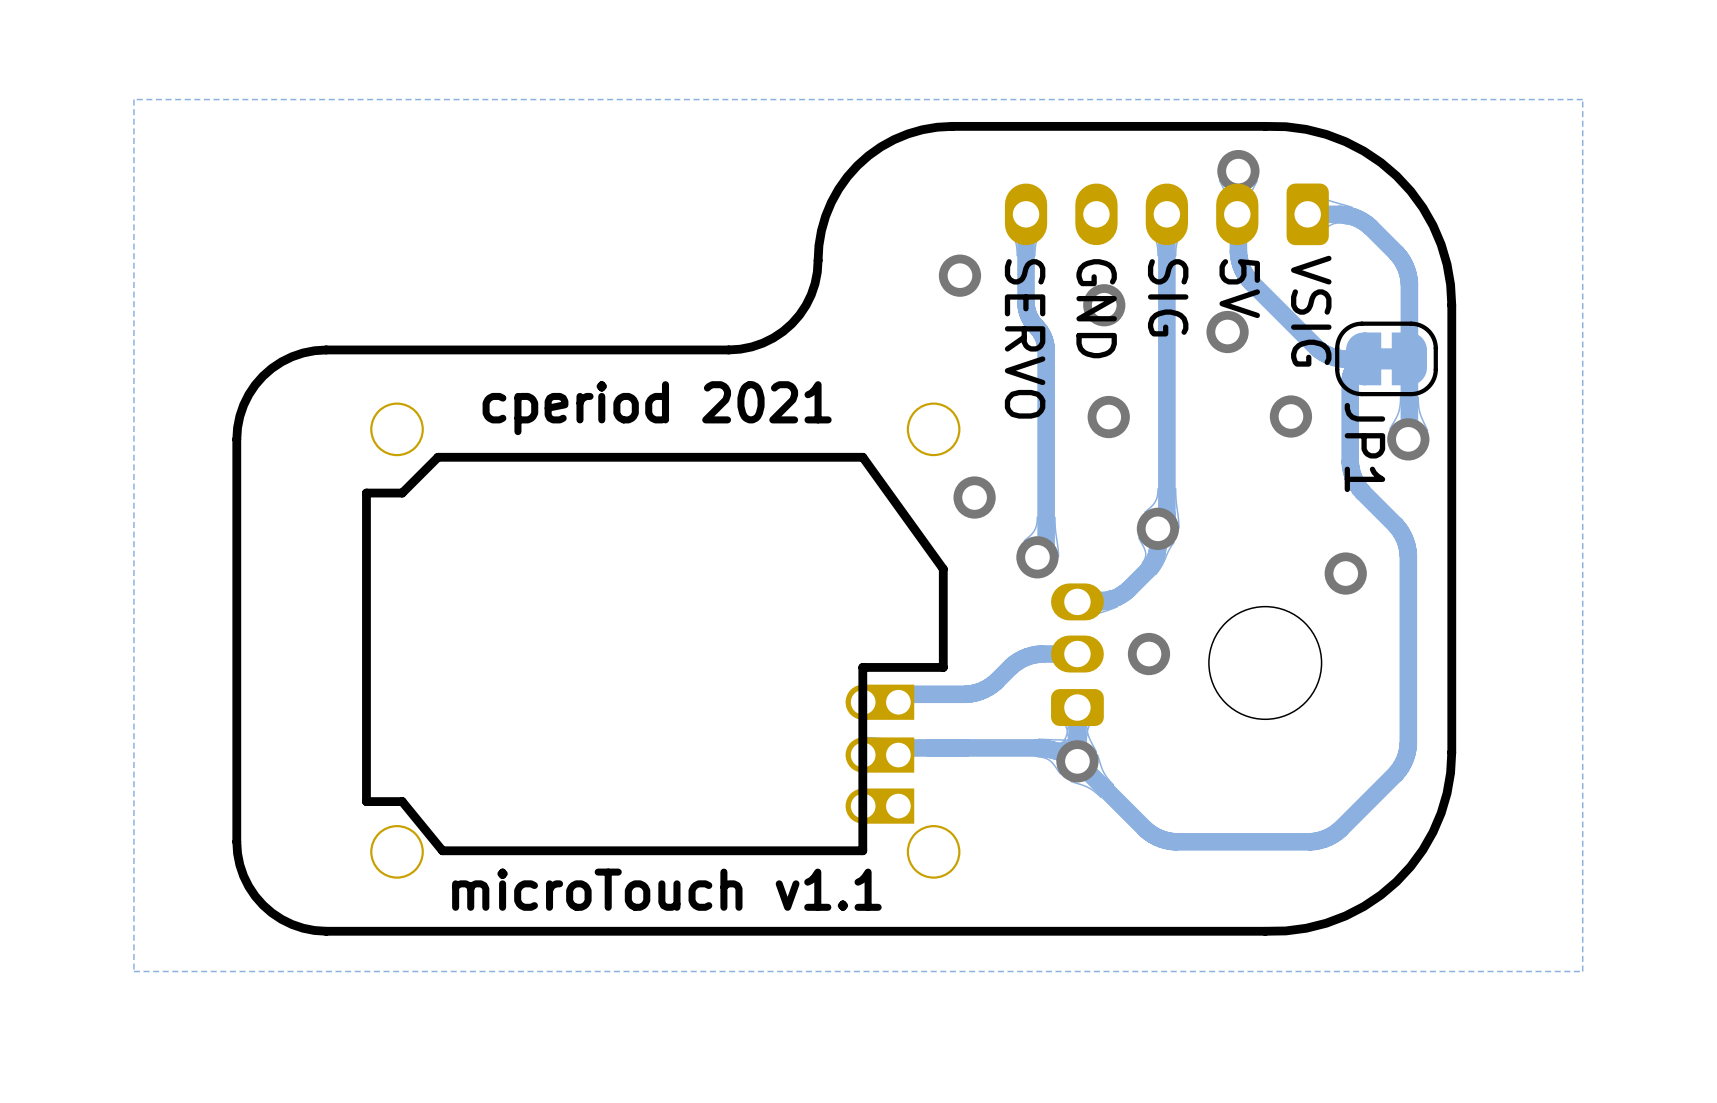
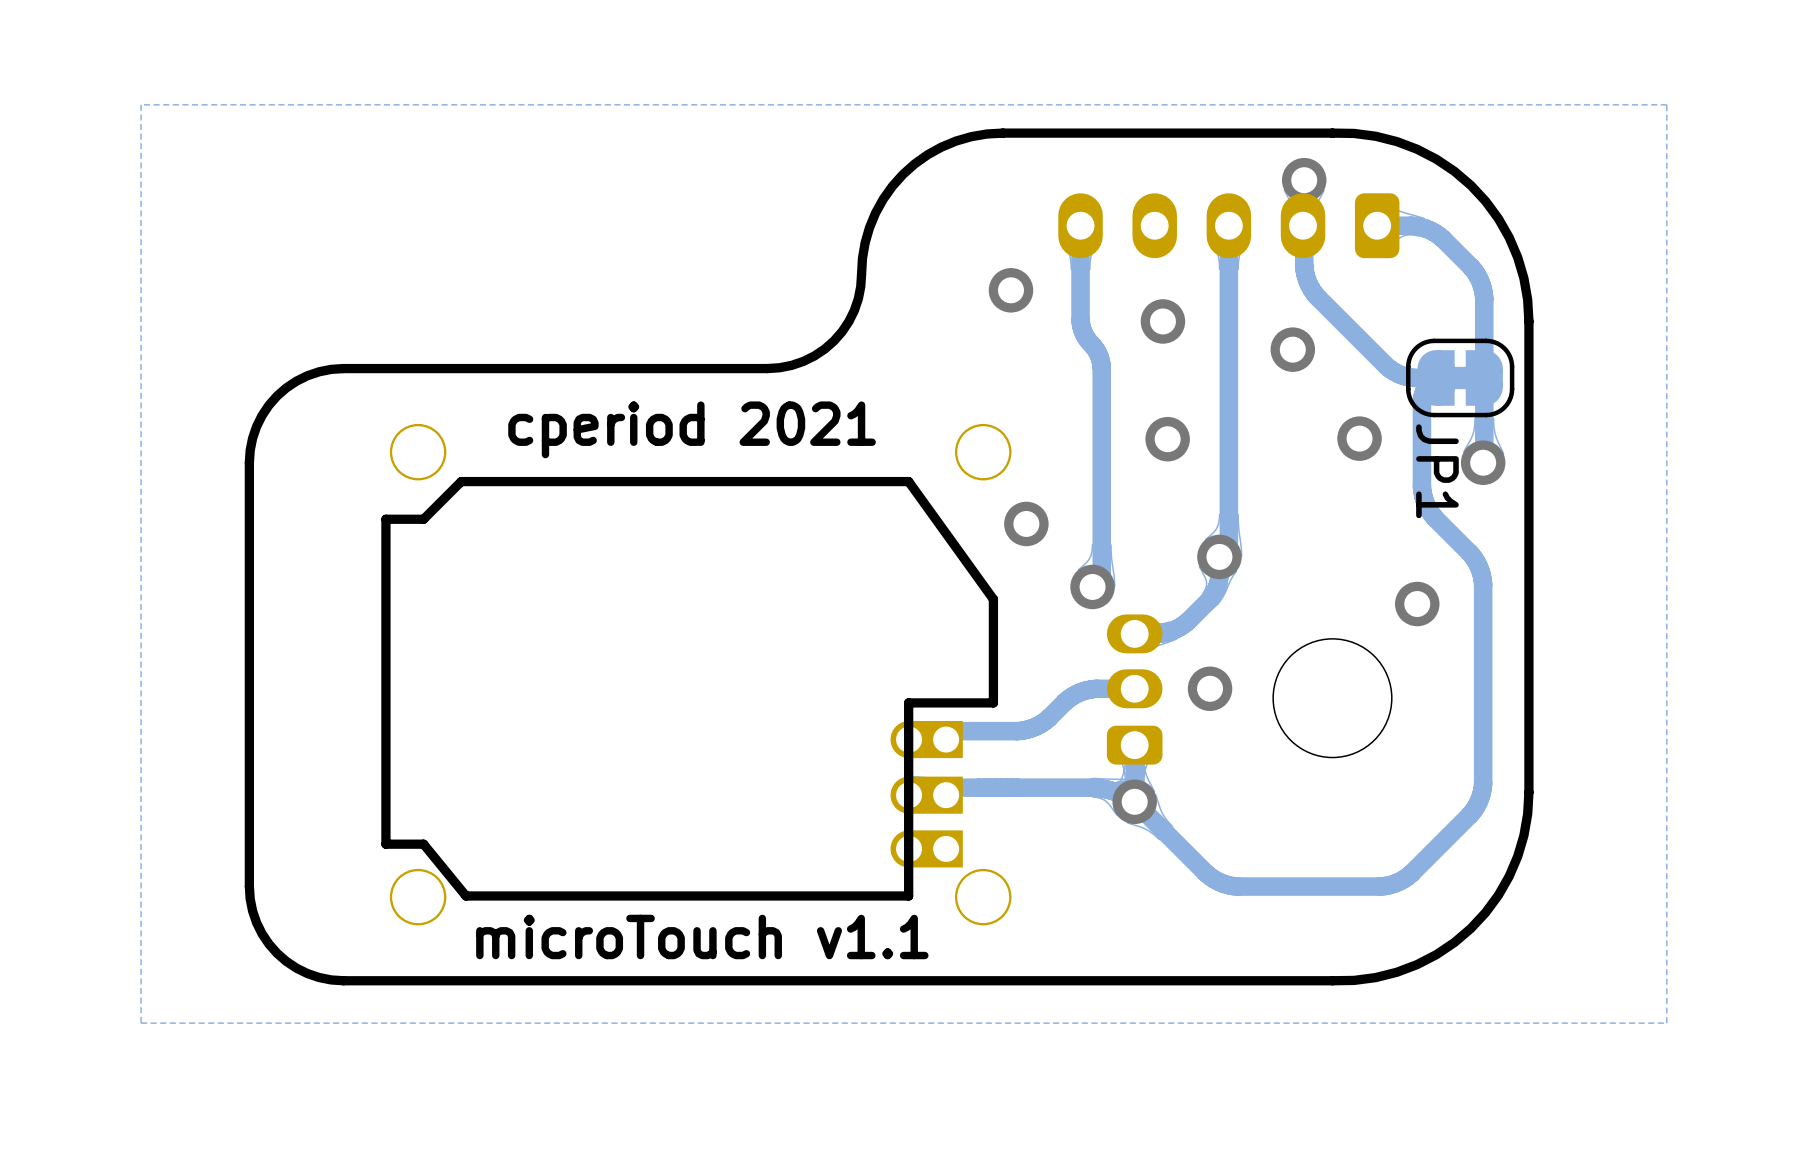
text: 5V (1239, 288) -> none
text: SIG (1168, 297) -> none
text: GND (1096, 308) -> none
text: VSIG (1311, 311) -> none
text: SERVO (1025, 338) -> none

